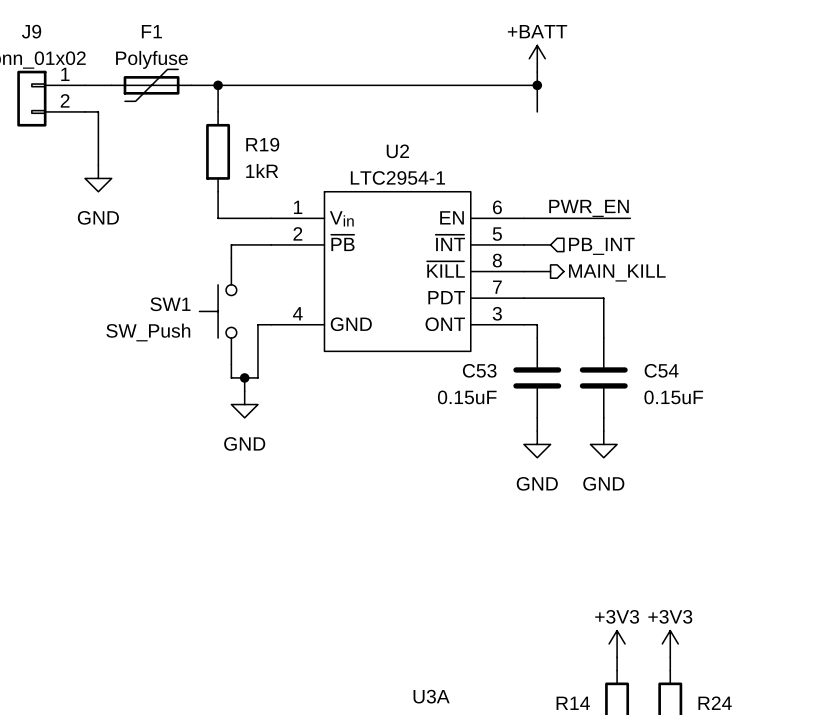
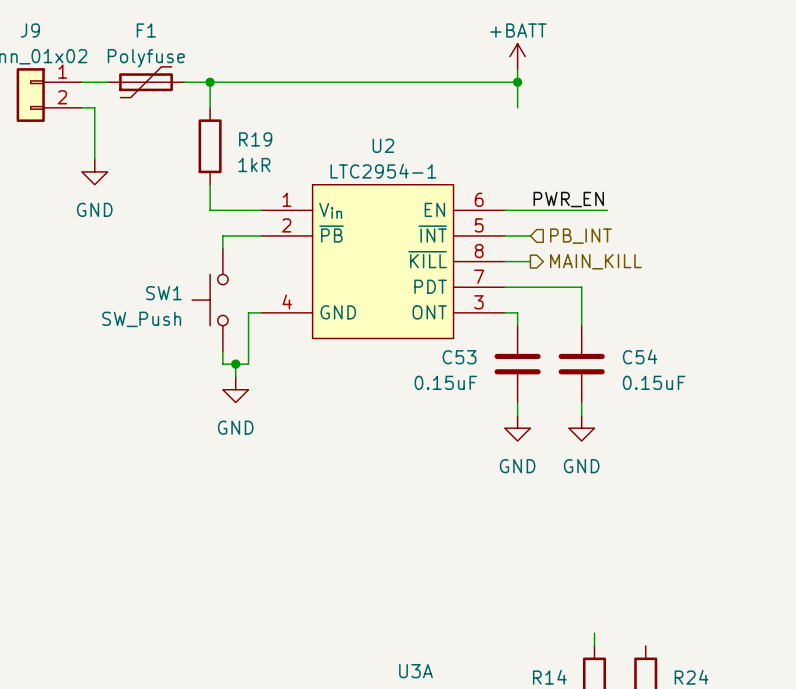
power symbol: +3V3 (617, 643) -> none
power symbol: +3V3 (670, 643) -> none
wire: (670, 657) (670, 670) -> none

